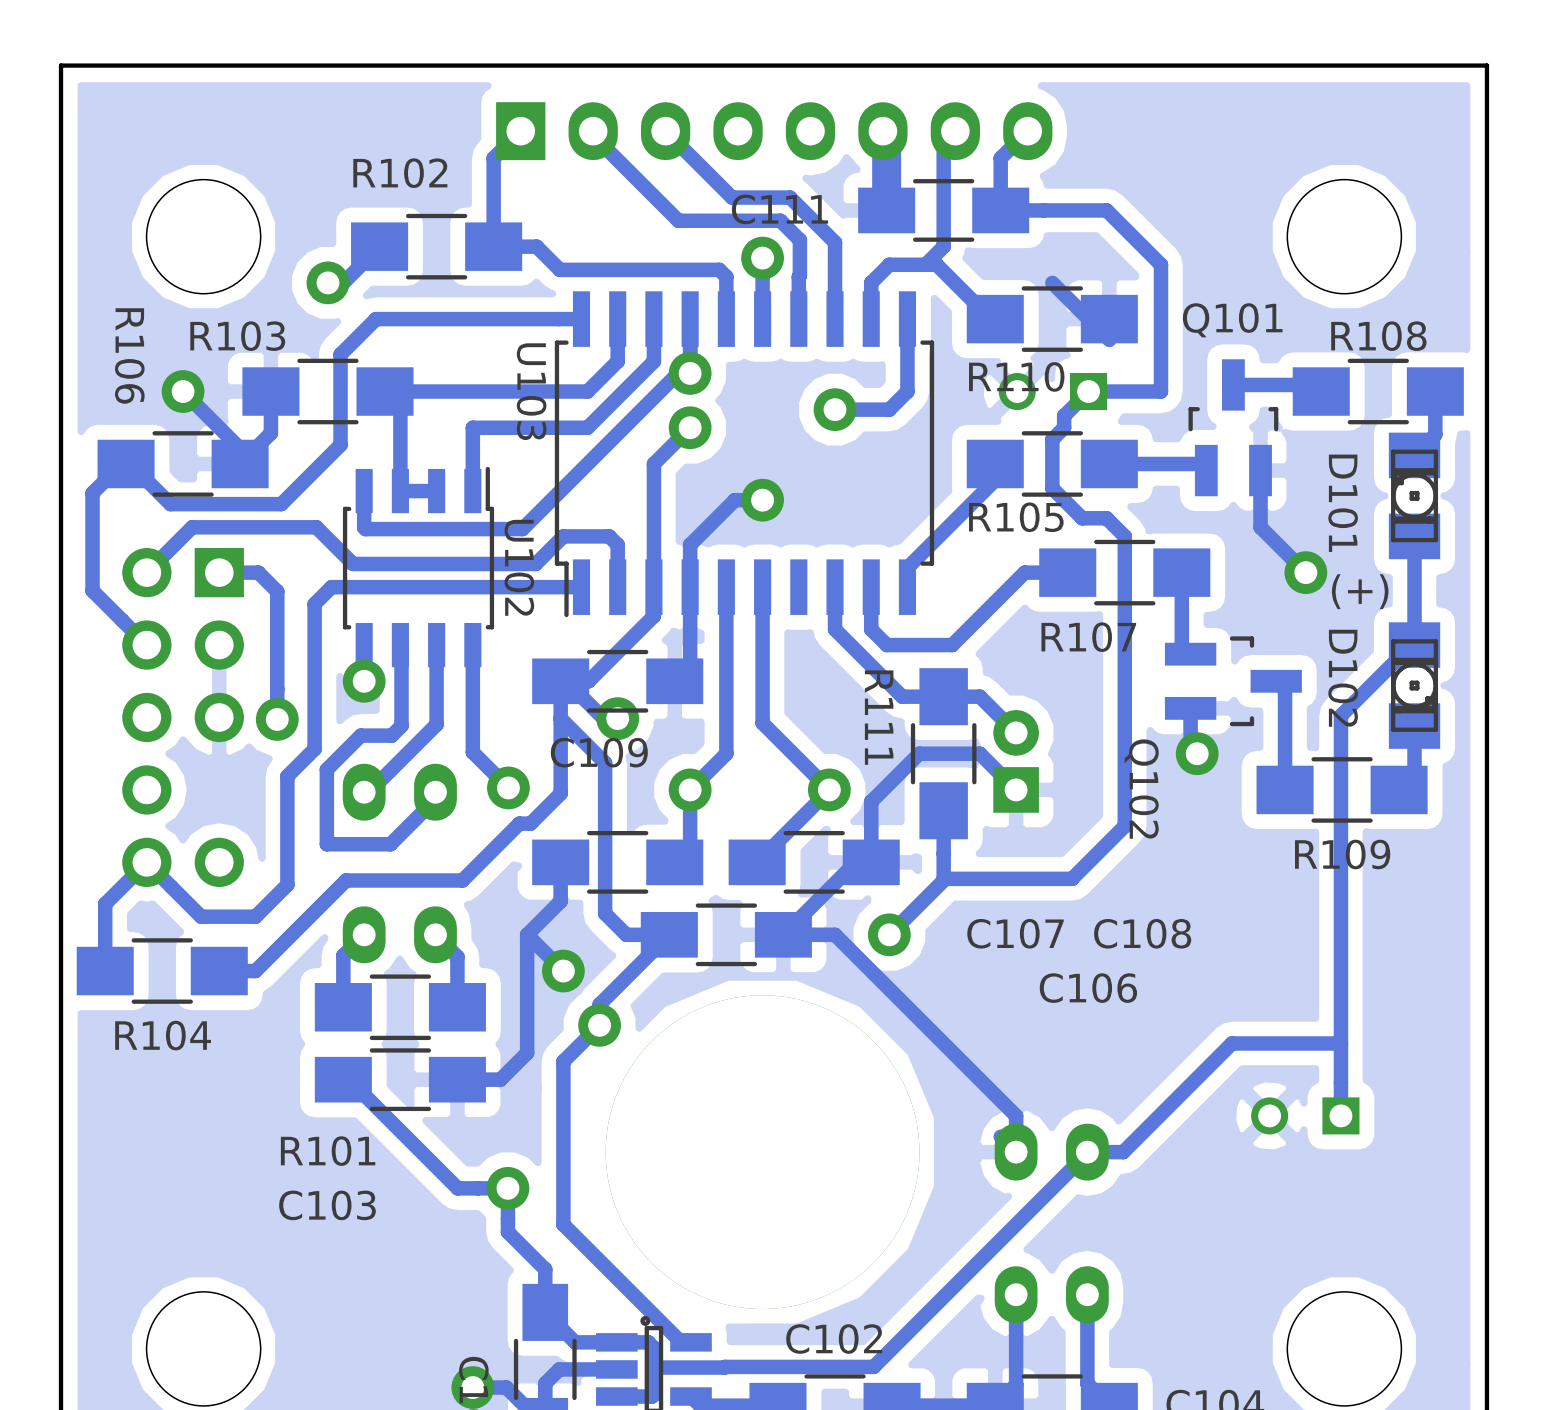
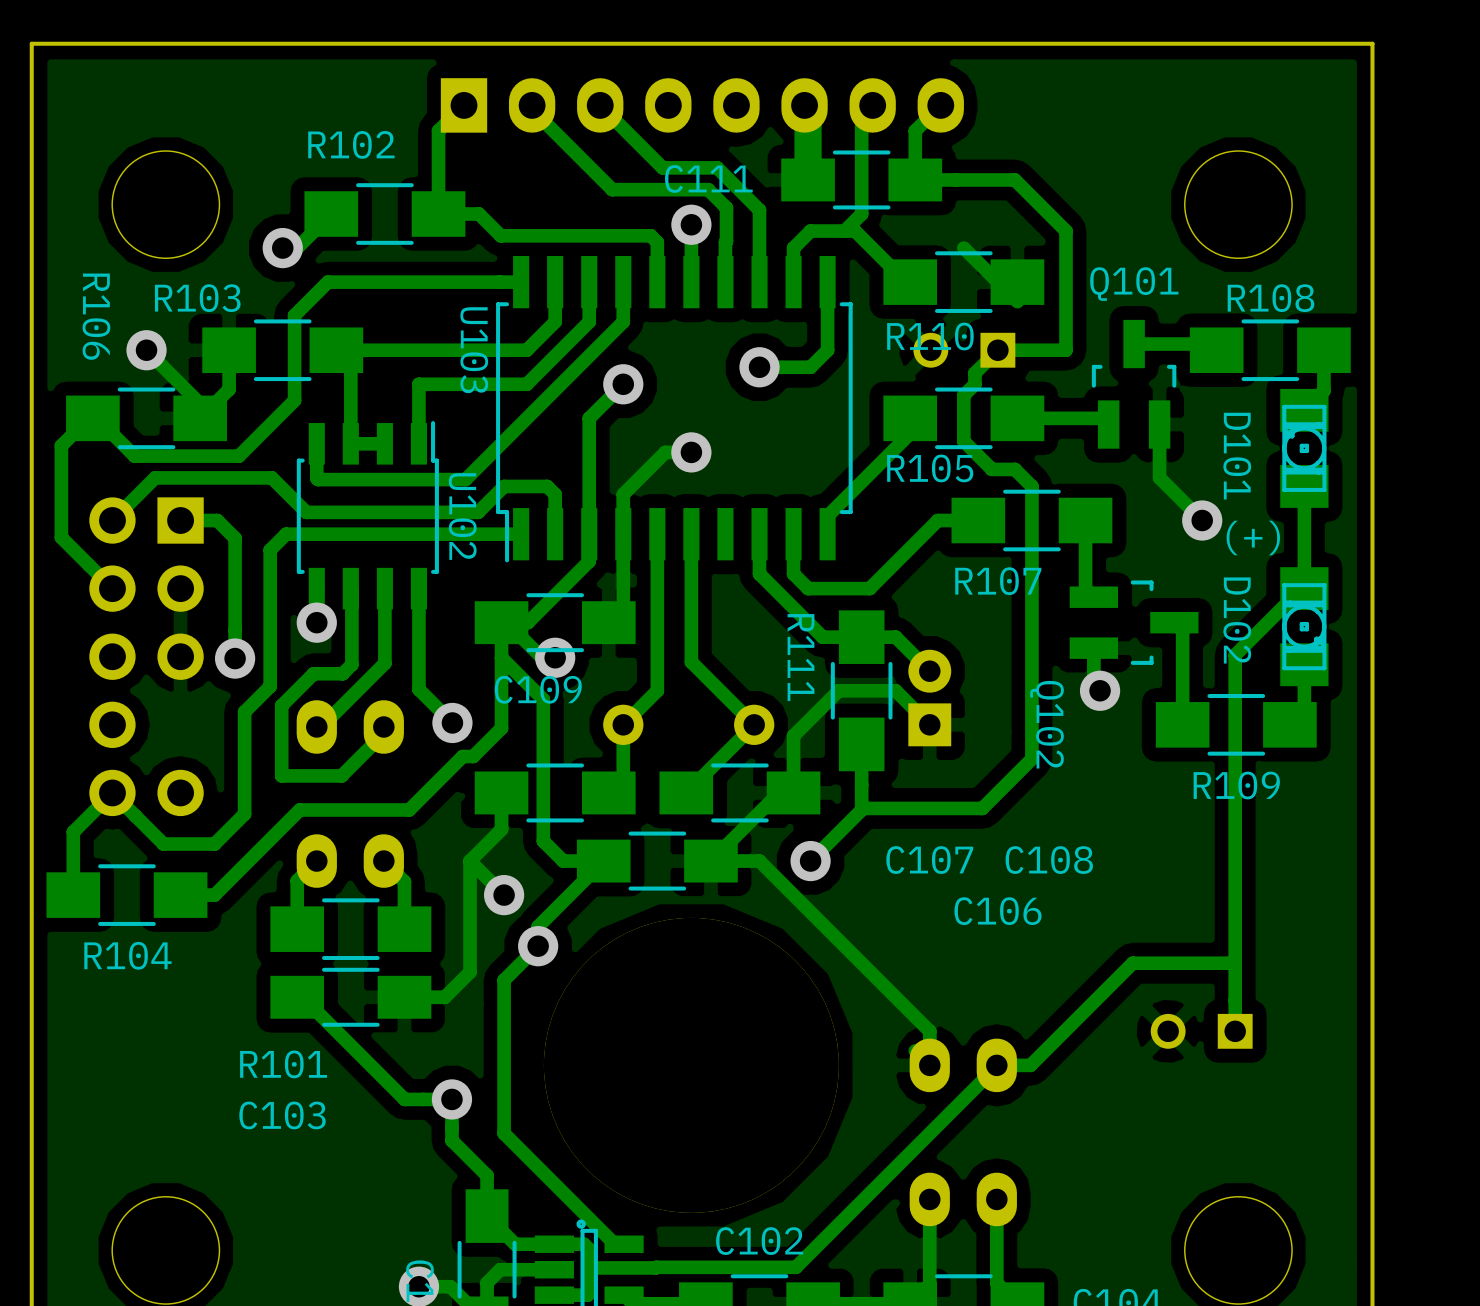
via: (690, 373) -> none

